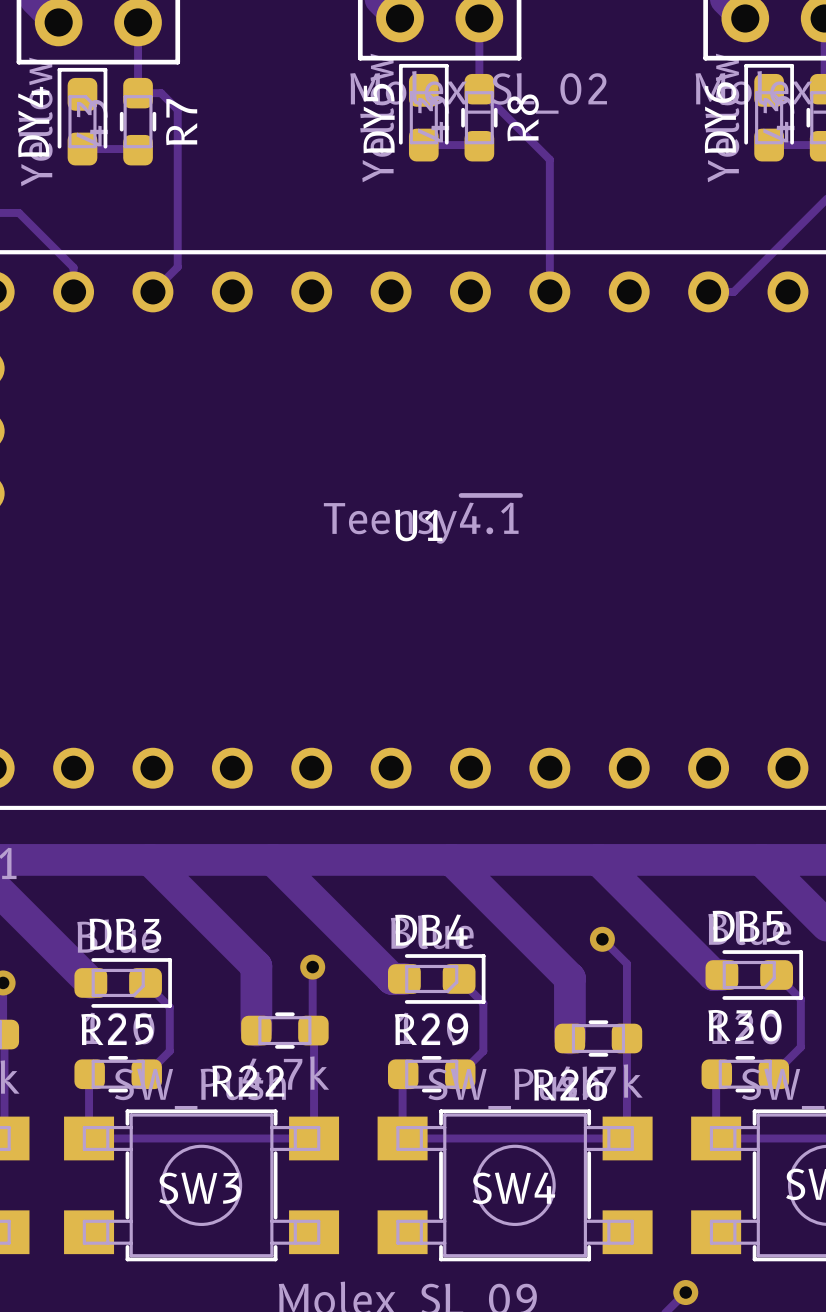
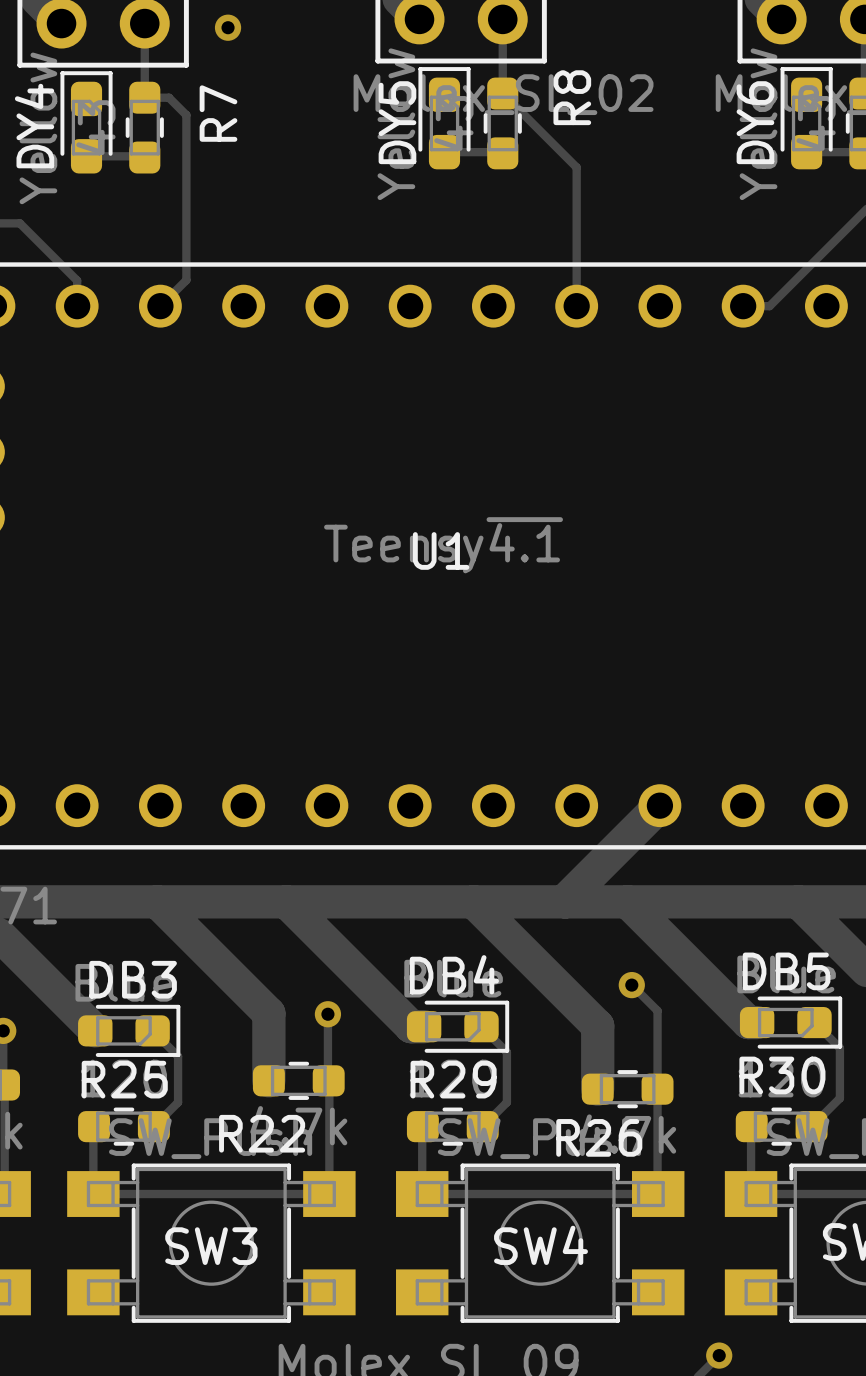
via: none -> (228, 27)
R8 name position: R8 (523, 117) -> R8 (572, 97)
R7 name position: R7 (181, 122) -> R7 (218, 113)
track: none -> (659, 805) (565, 901)

